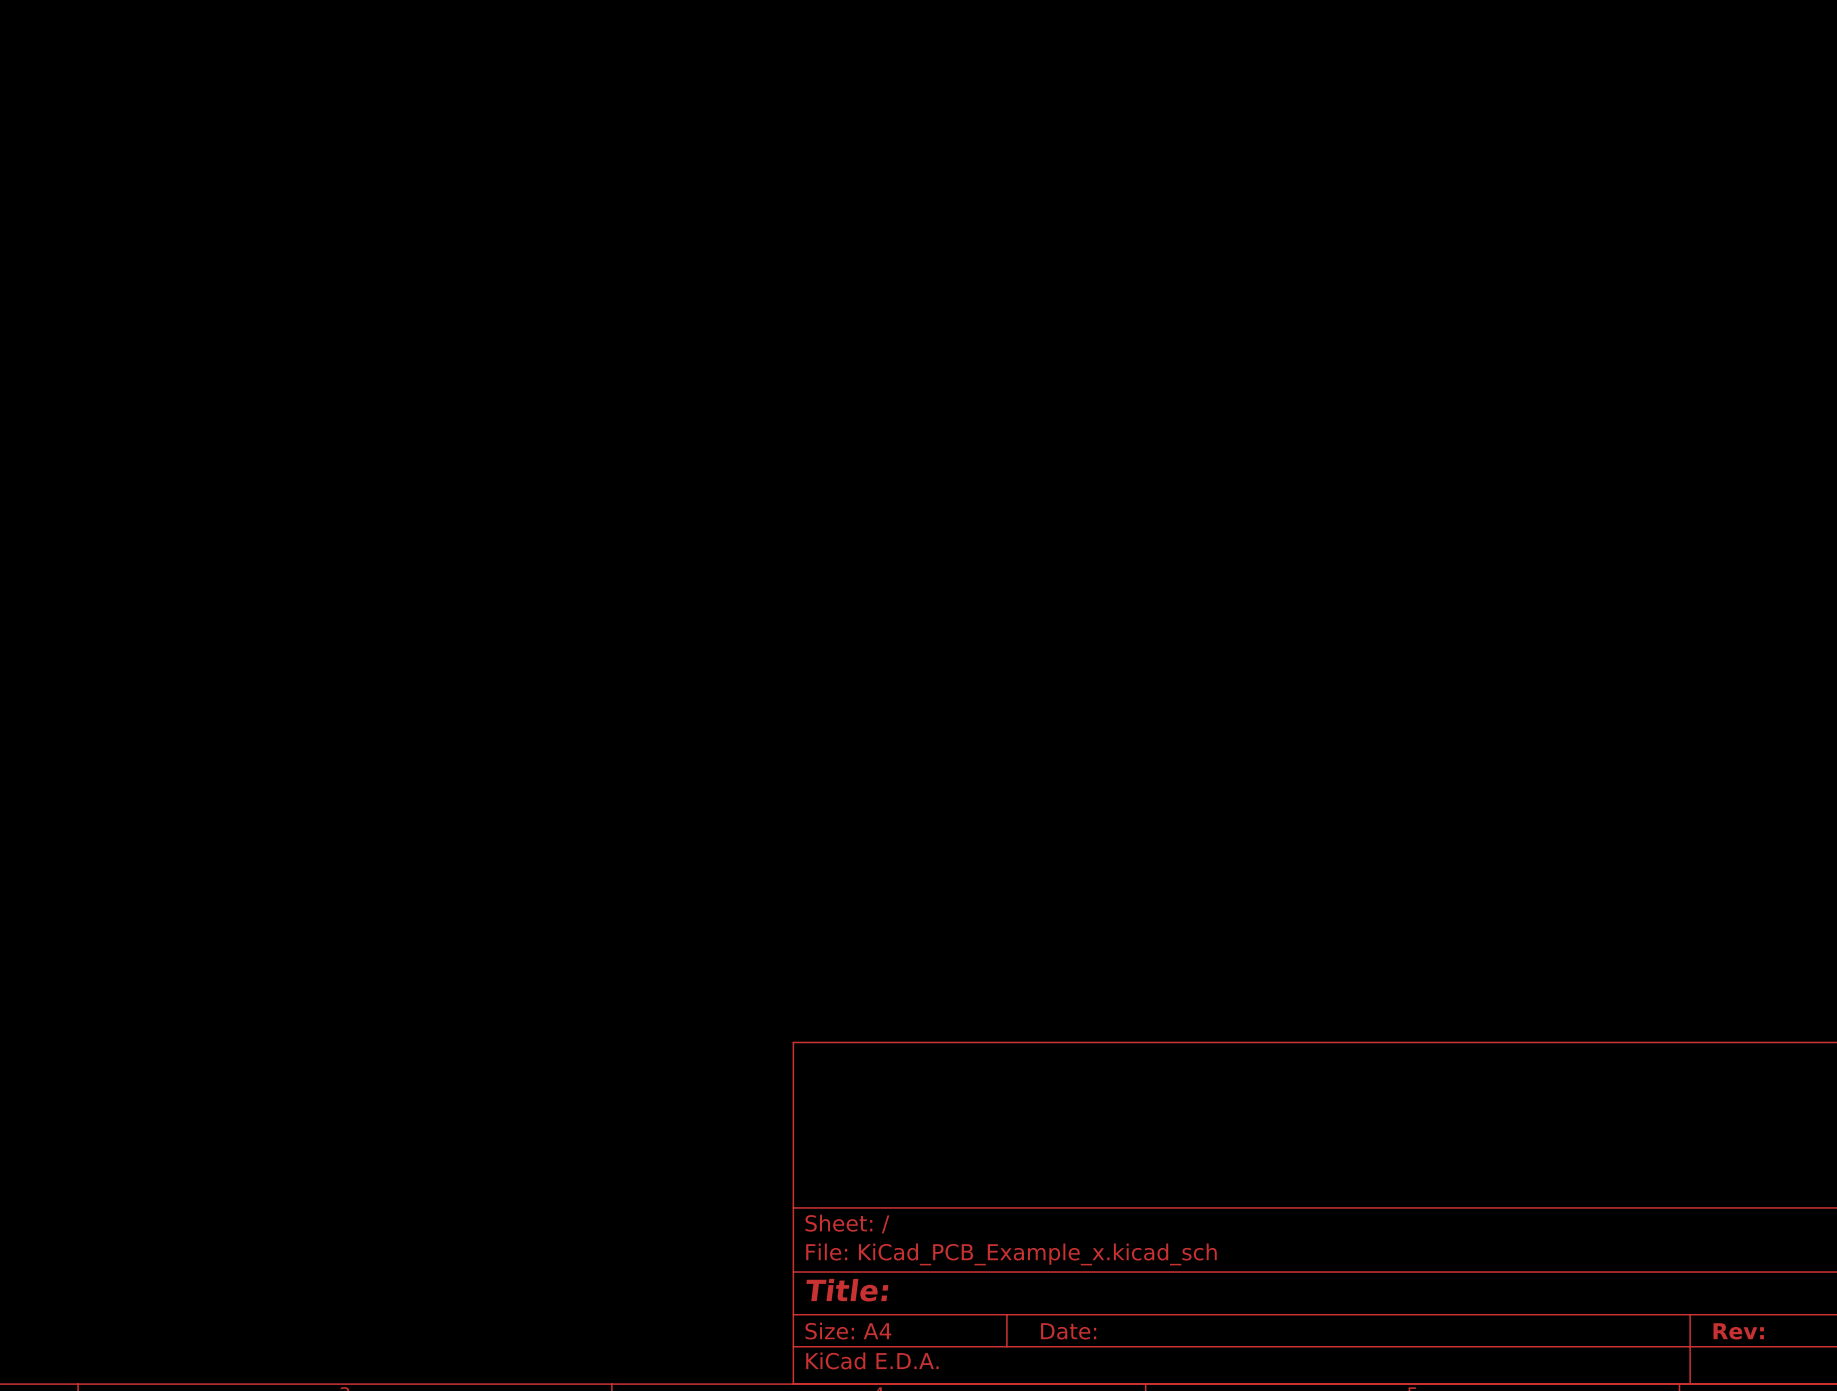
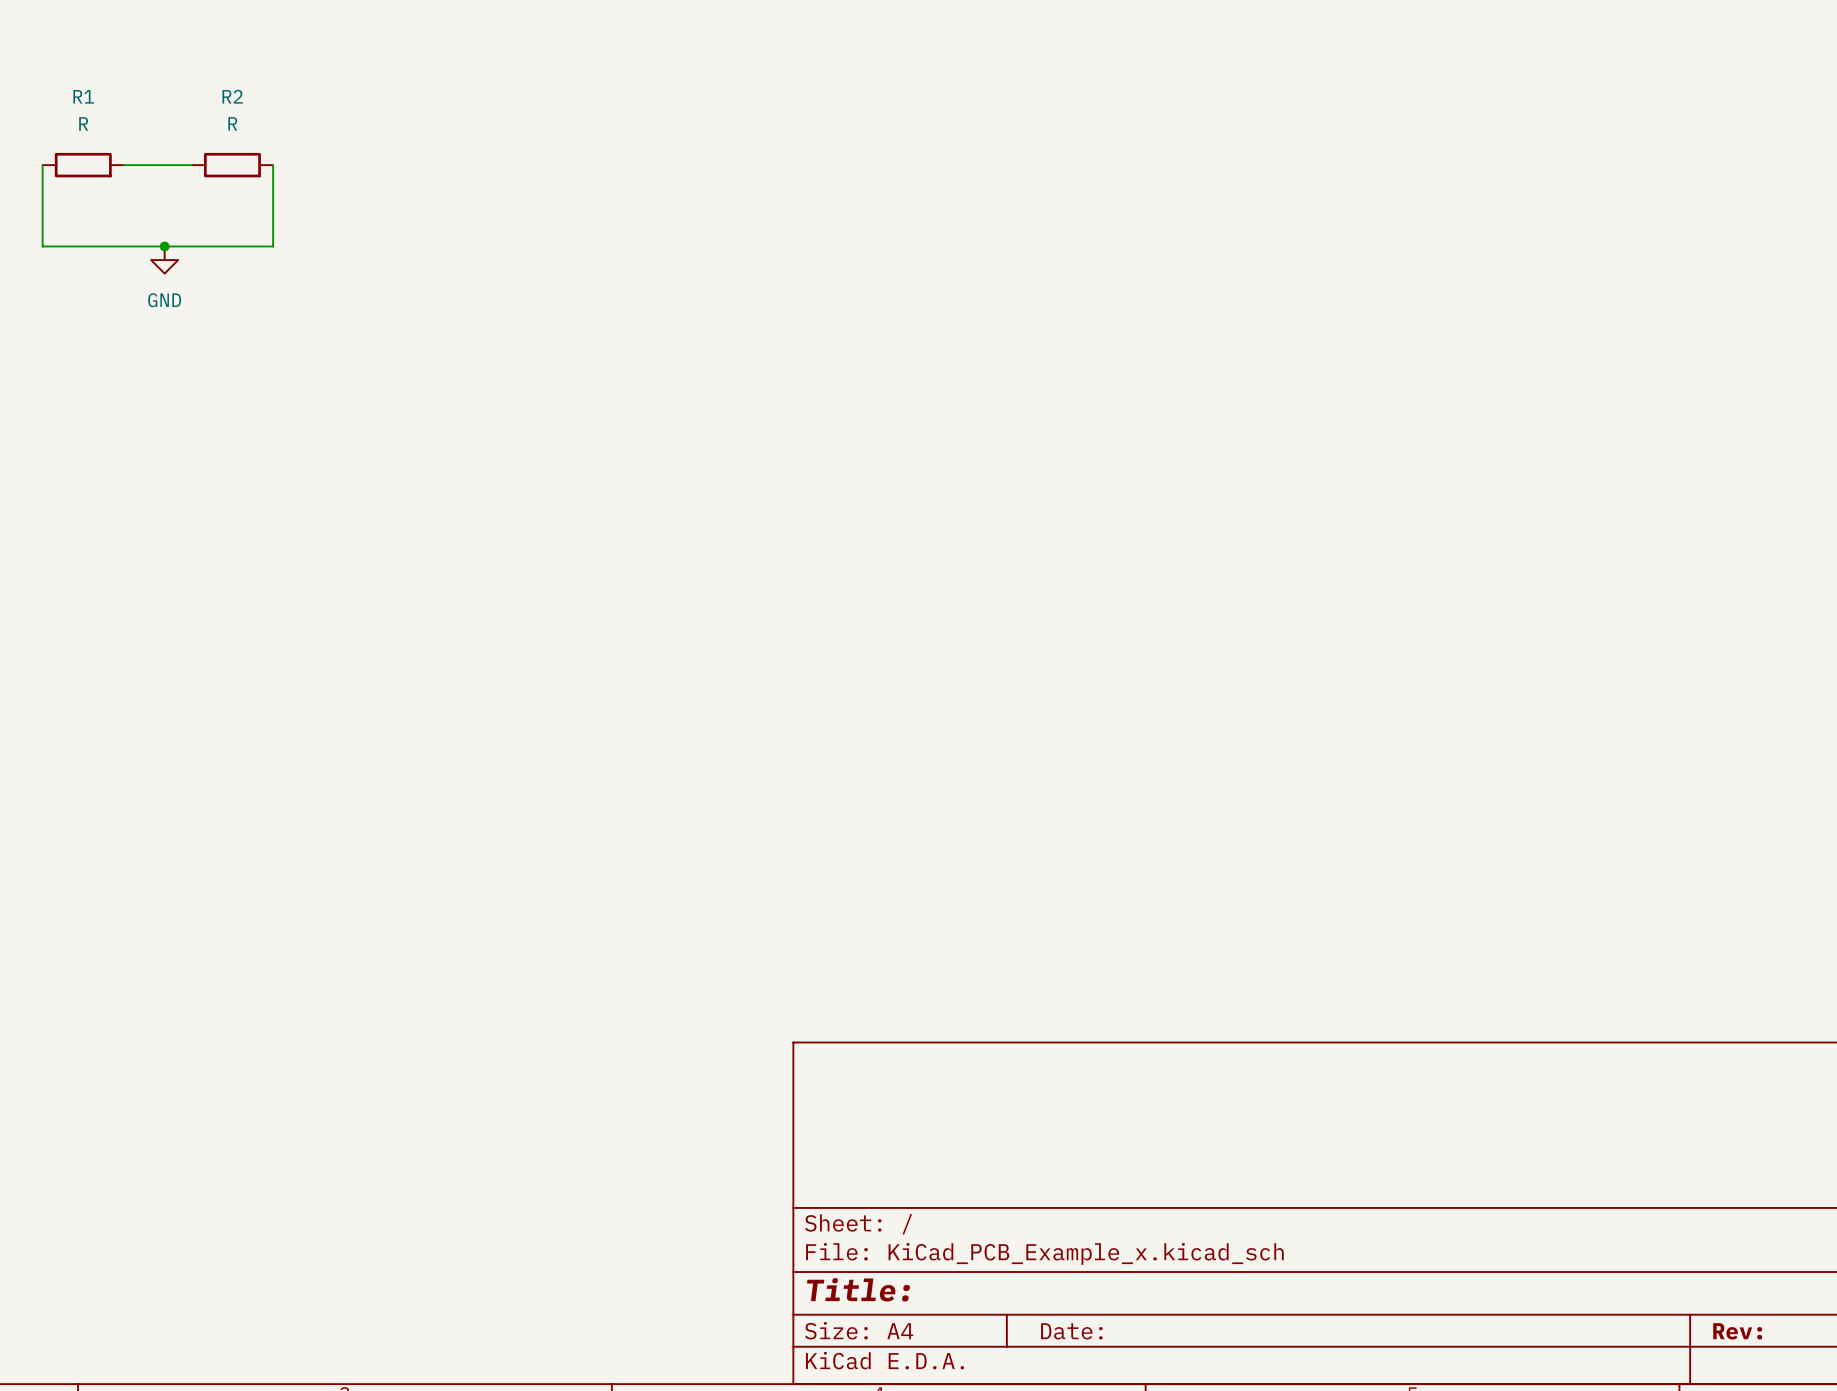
wire: none -> (42, 165) (42, 246) (273, 246) (273, 165)
R1: none -> R (83, 165)
wire: none -> (123, 165) (191, 165)
R2: none -> R (232, 165)
junction: none -> (164, 246)
power symbol: none -> GND (164, 260)

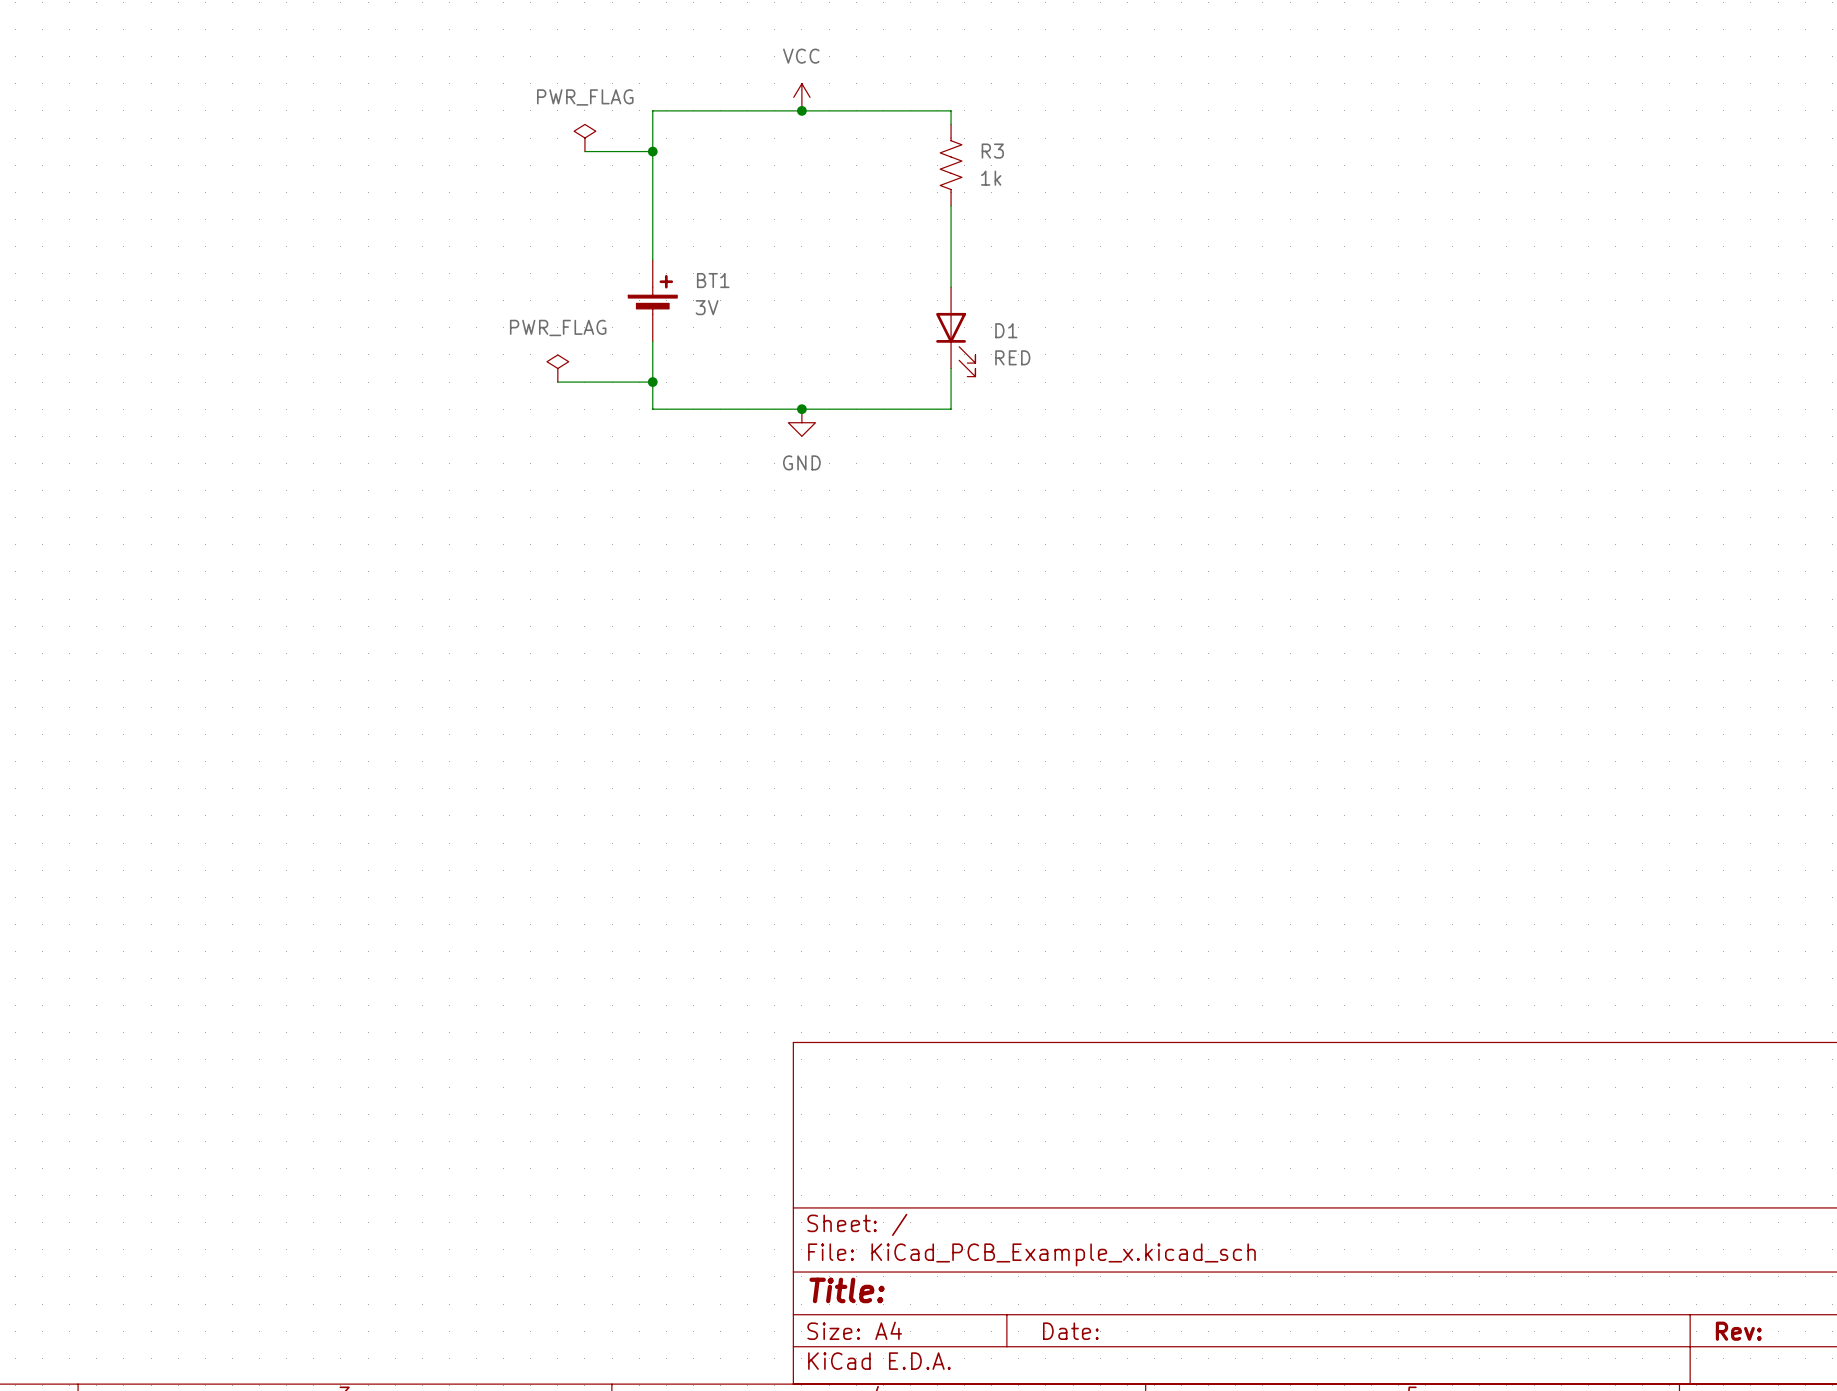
power symbol: none -> VCC (801, 97)
junction: none -> (801, 110)
wire: none -> (951, 124) (951, 110) (652, 110) (652, 260)
power symbol: none -> PWR_FLAG (584, 138)
wire: none -> (584, 151) (652, 151)
junction: none -> (652, 151)
wire: (42, 165) (42, 246) (273, 246) (273, 165) -> none
R1: R (83, 165) -> none
wire: (123, 165) (191, 165) -> none
R2: R (232, 165) -> none
R3: none -> 1k (951, 165)
wire: none -> (951, 205) (951, 287)
junction: (164, 246) -> none
power symbol: GND (164, 260) -> none
BT1: none -> 3V (652, 300)
D1: none -> RED (955, 331)
wire: none -> (652, 341) (652, 409) (951, 409) (951, 368)
power symbol: none -> PWR_FLAG (557, 368)
wire: none -> (557, 382) (652, 382)
junction: none -> (652, 382)
junction: none -> (801, 409)
power symbol: none -> GND (801, 422)

